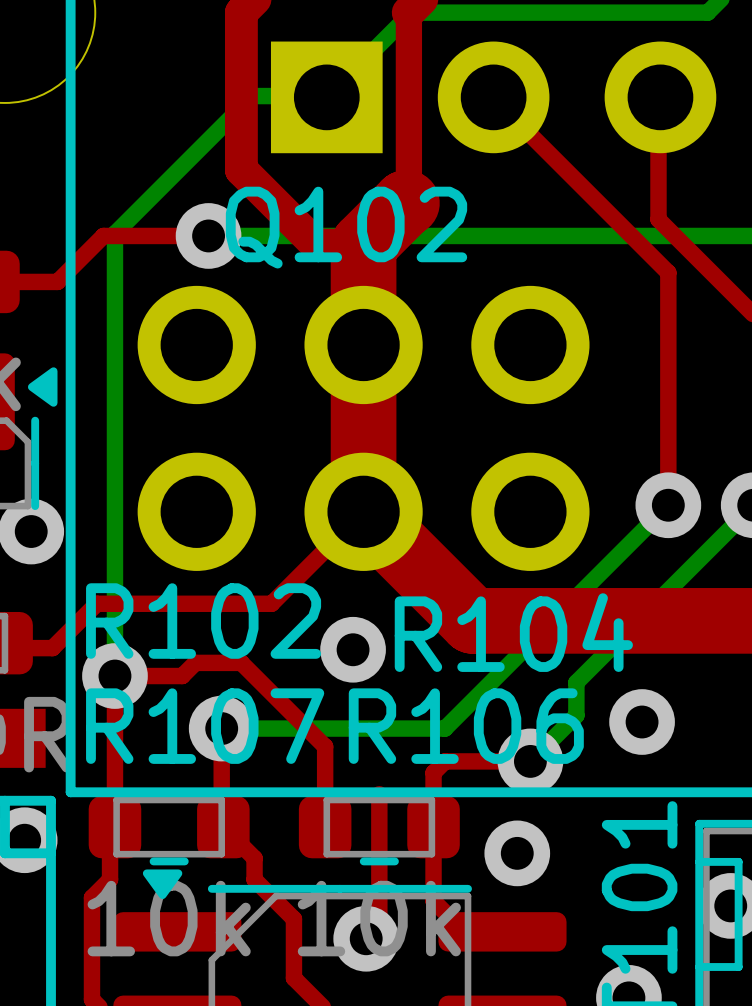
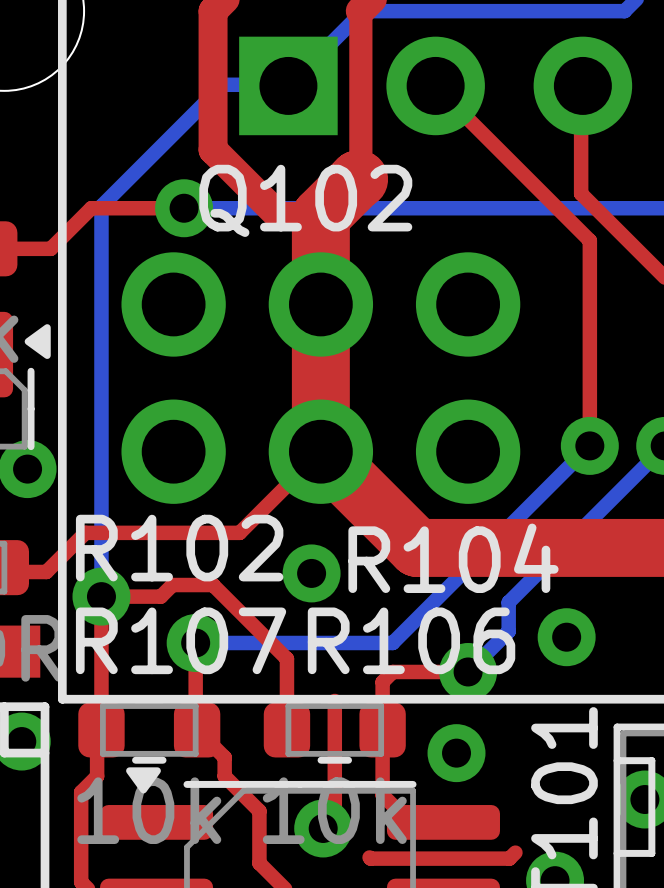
top track: none -> (515, 852) (509, 858) (369, 857)

